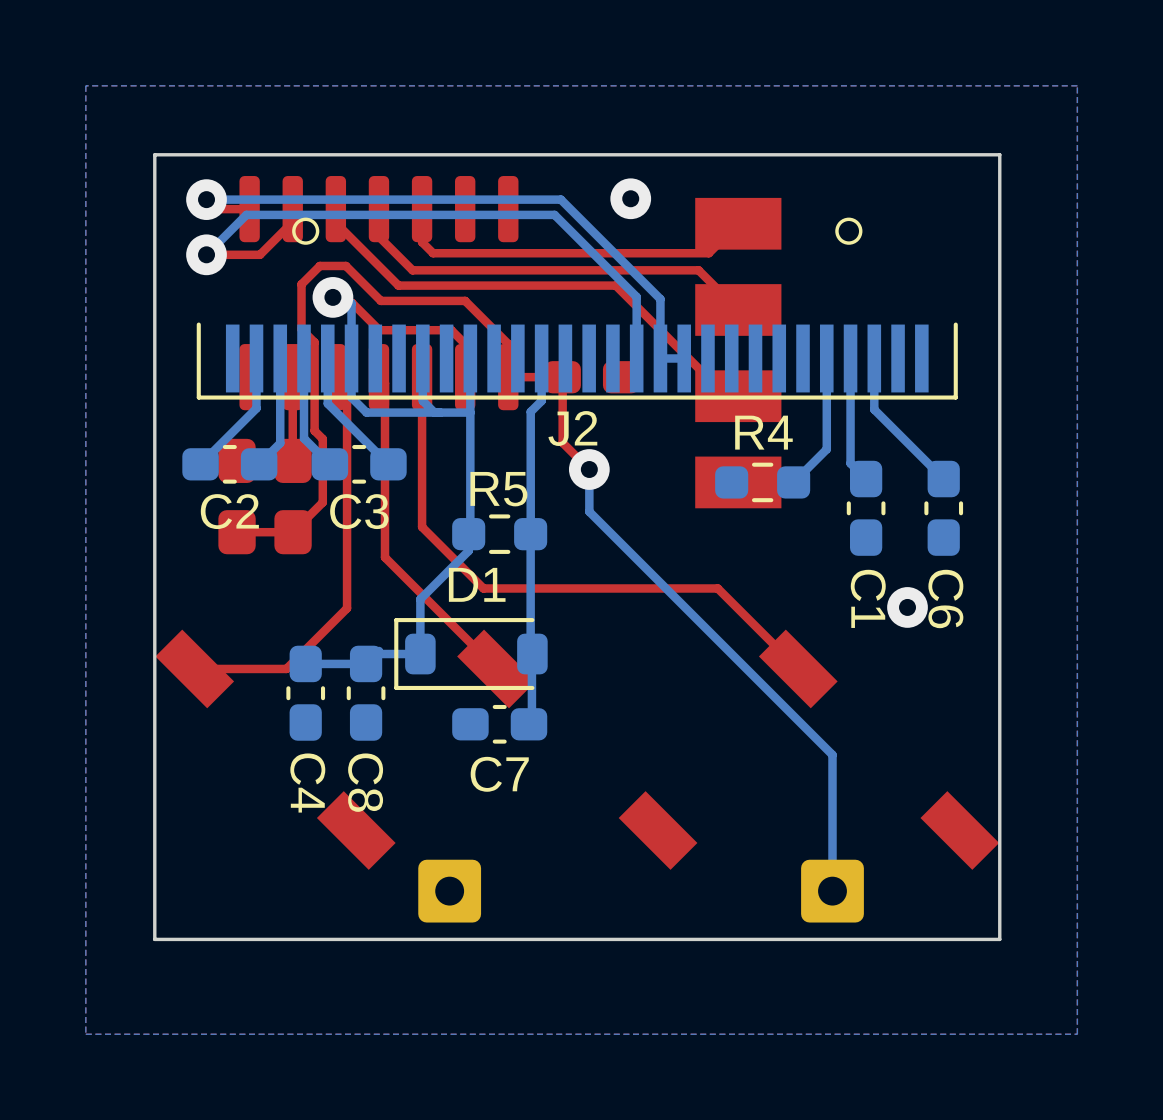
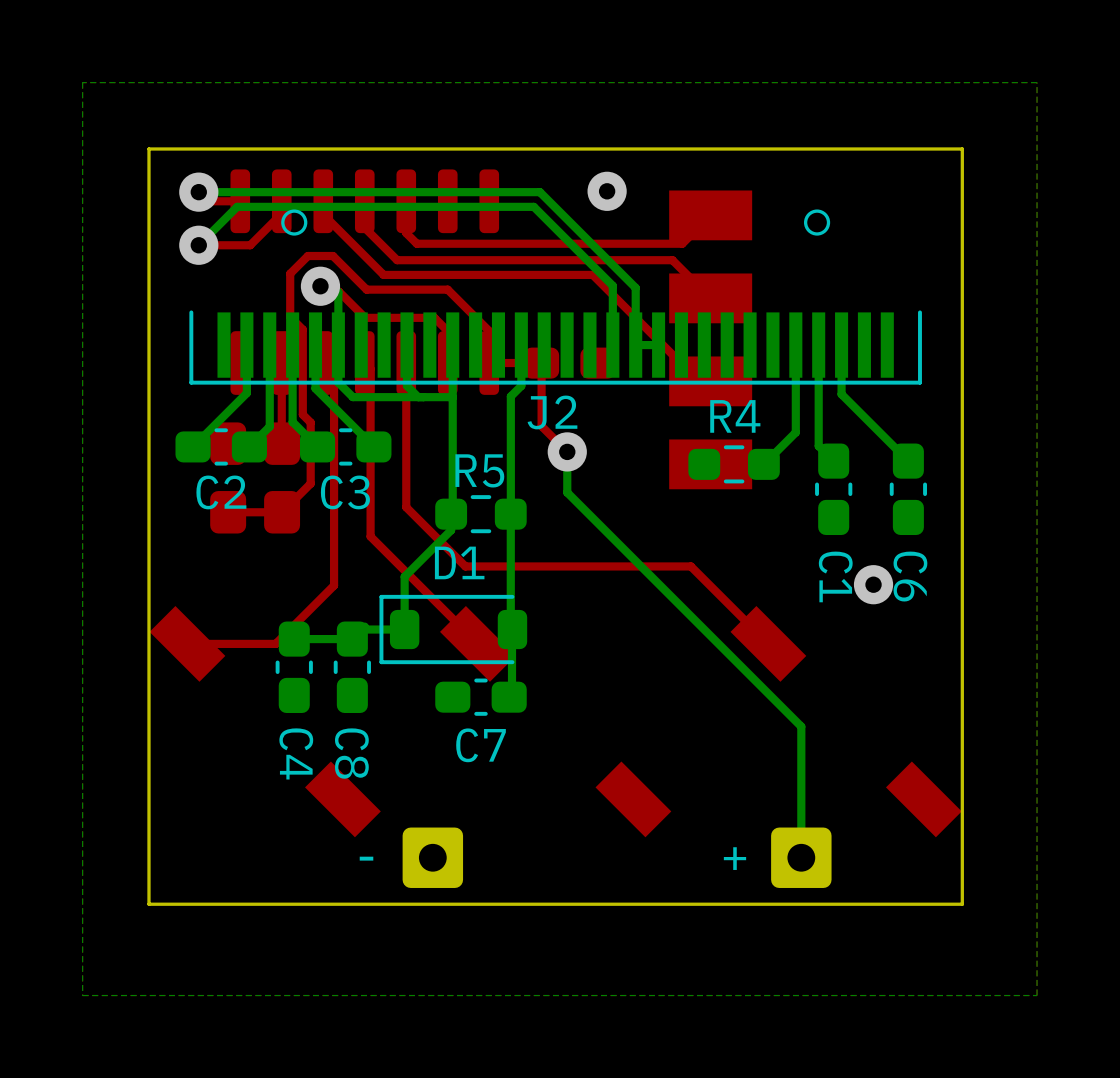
text: none -> + (735, 858)
text: none -> - (366, 858)

